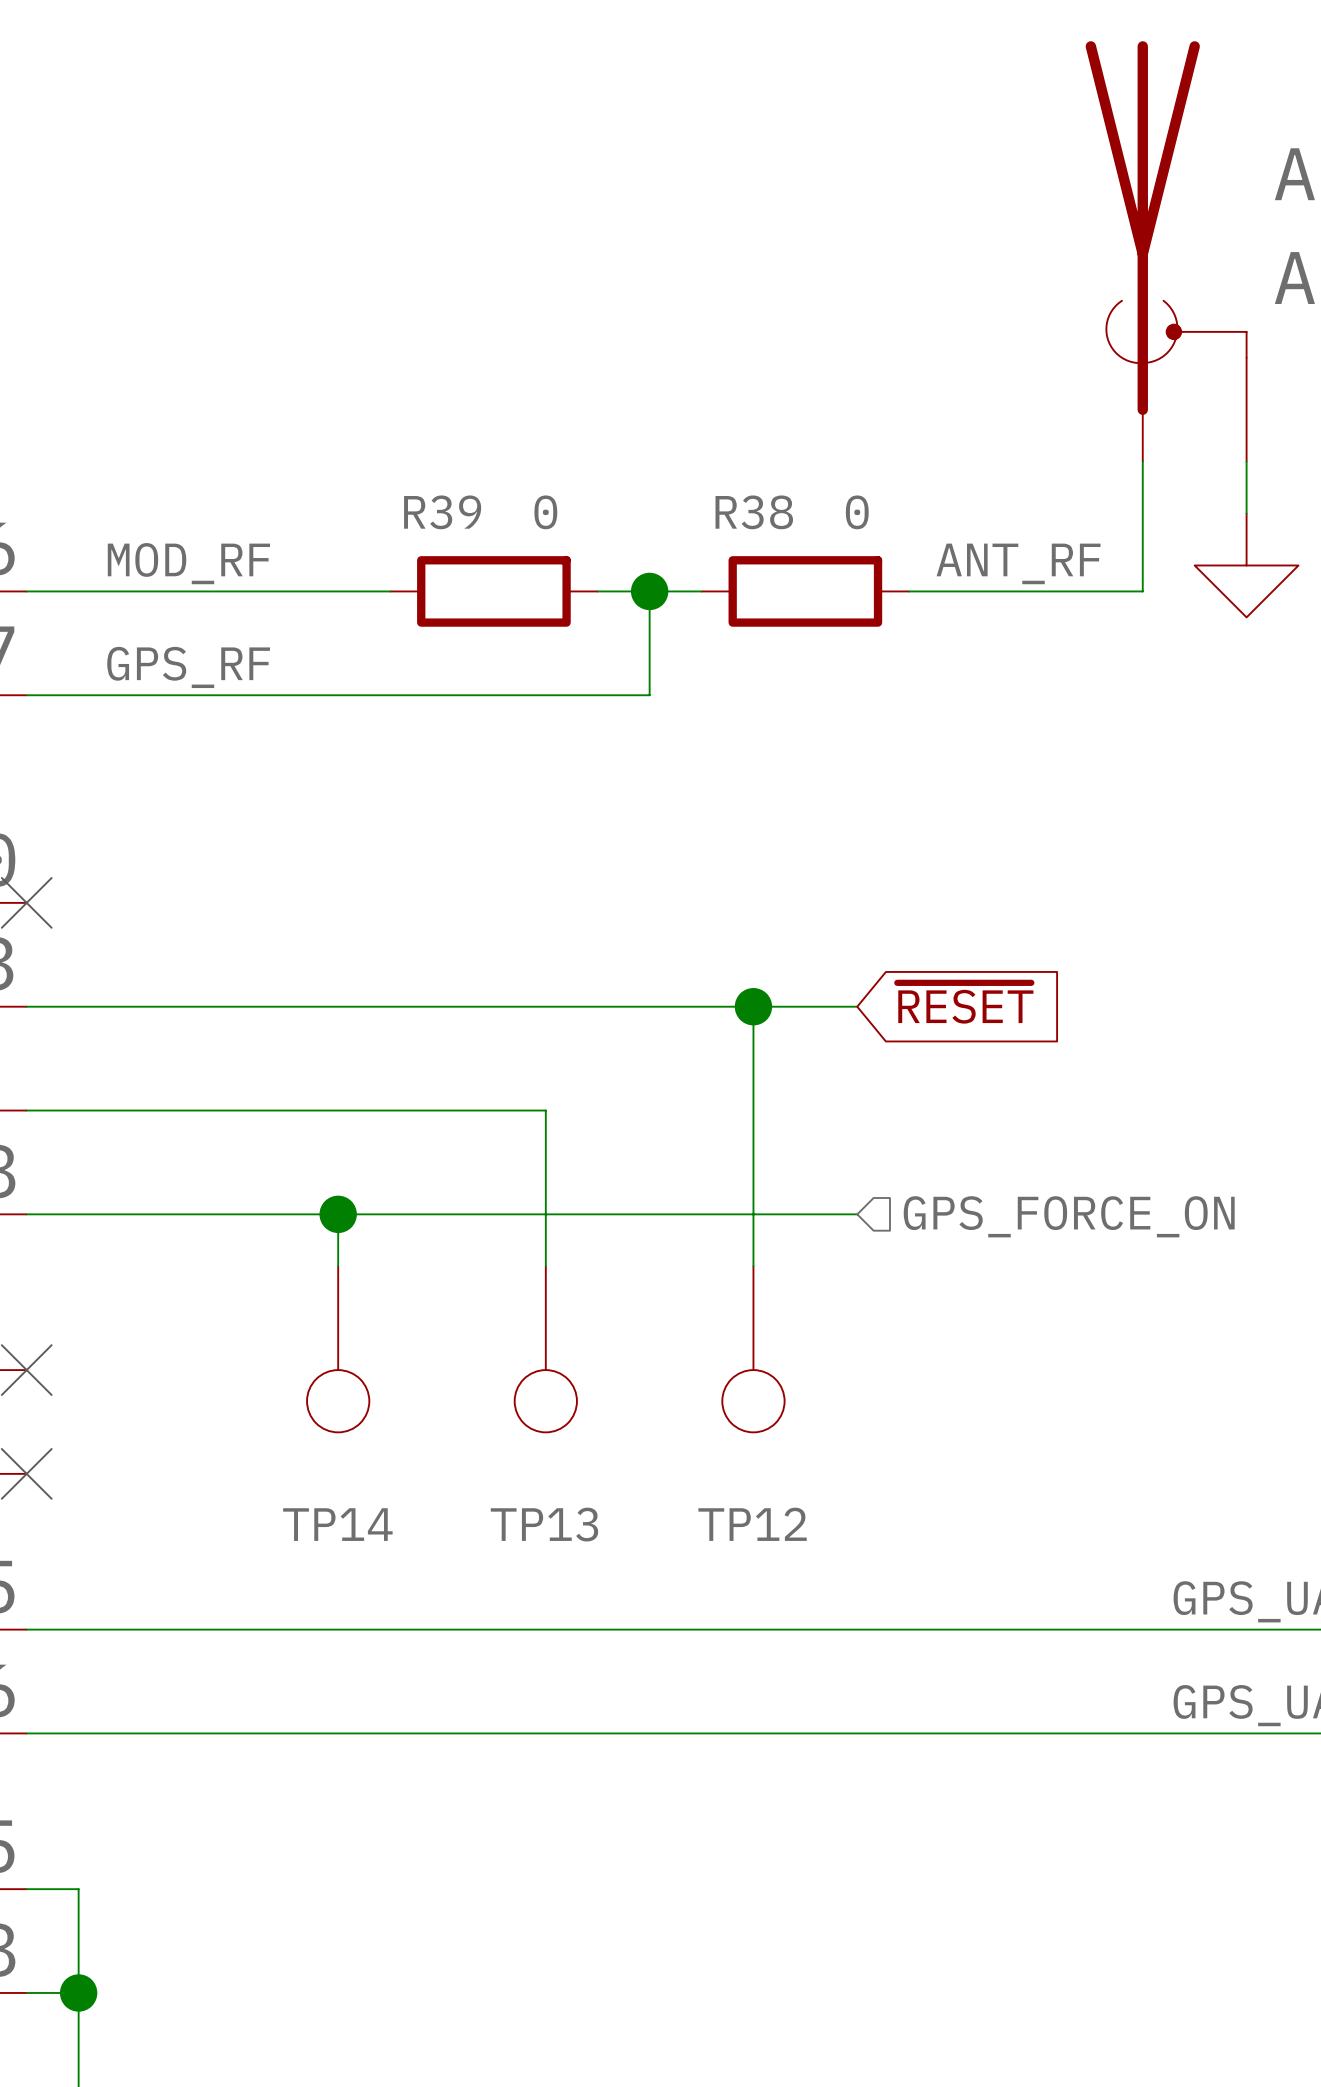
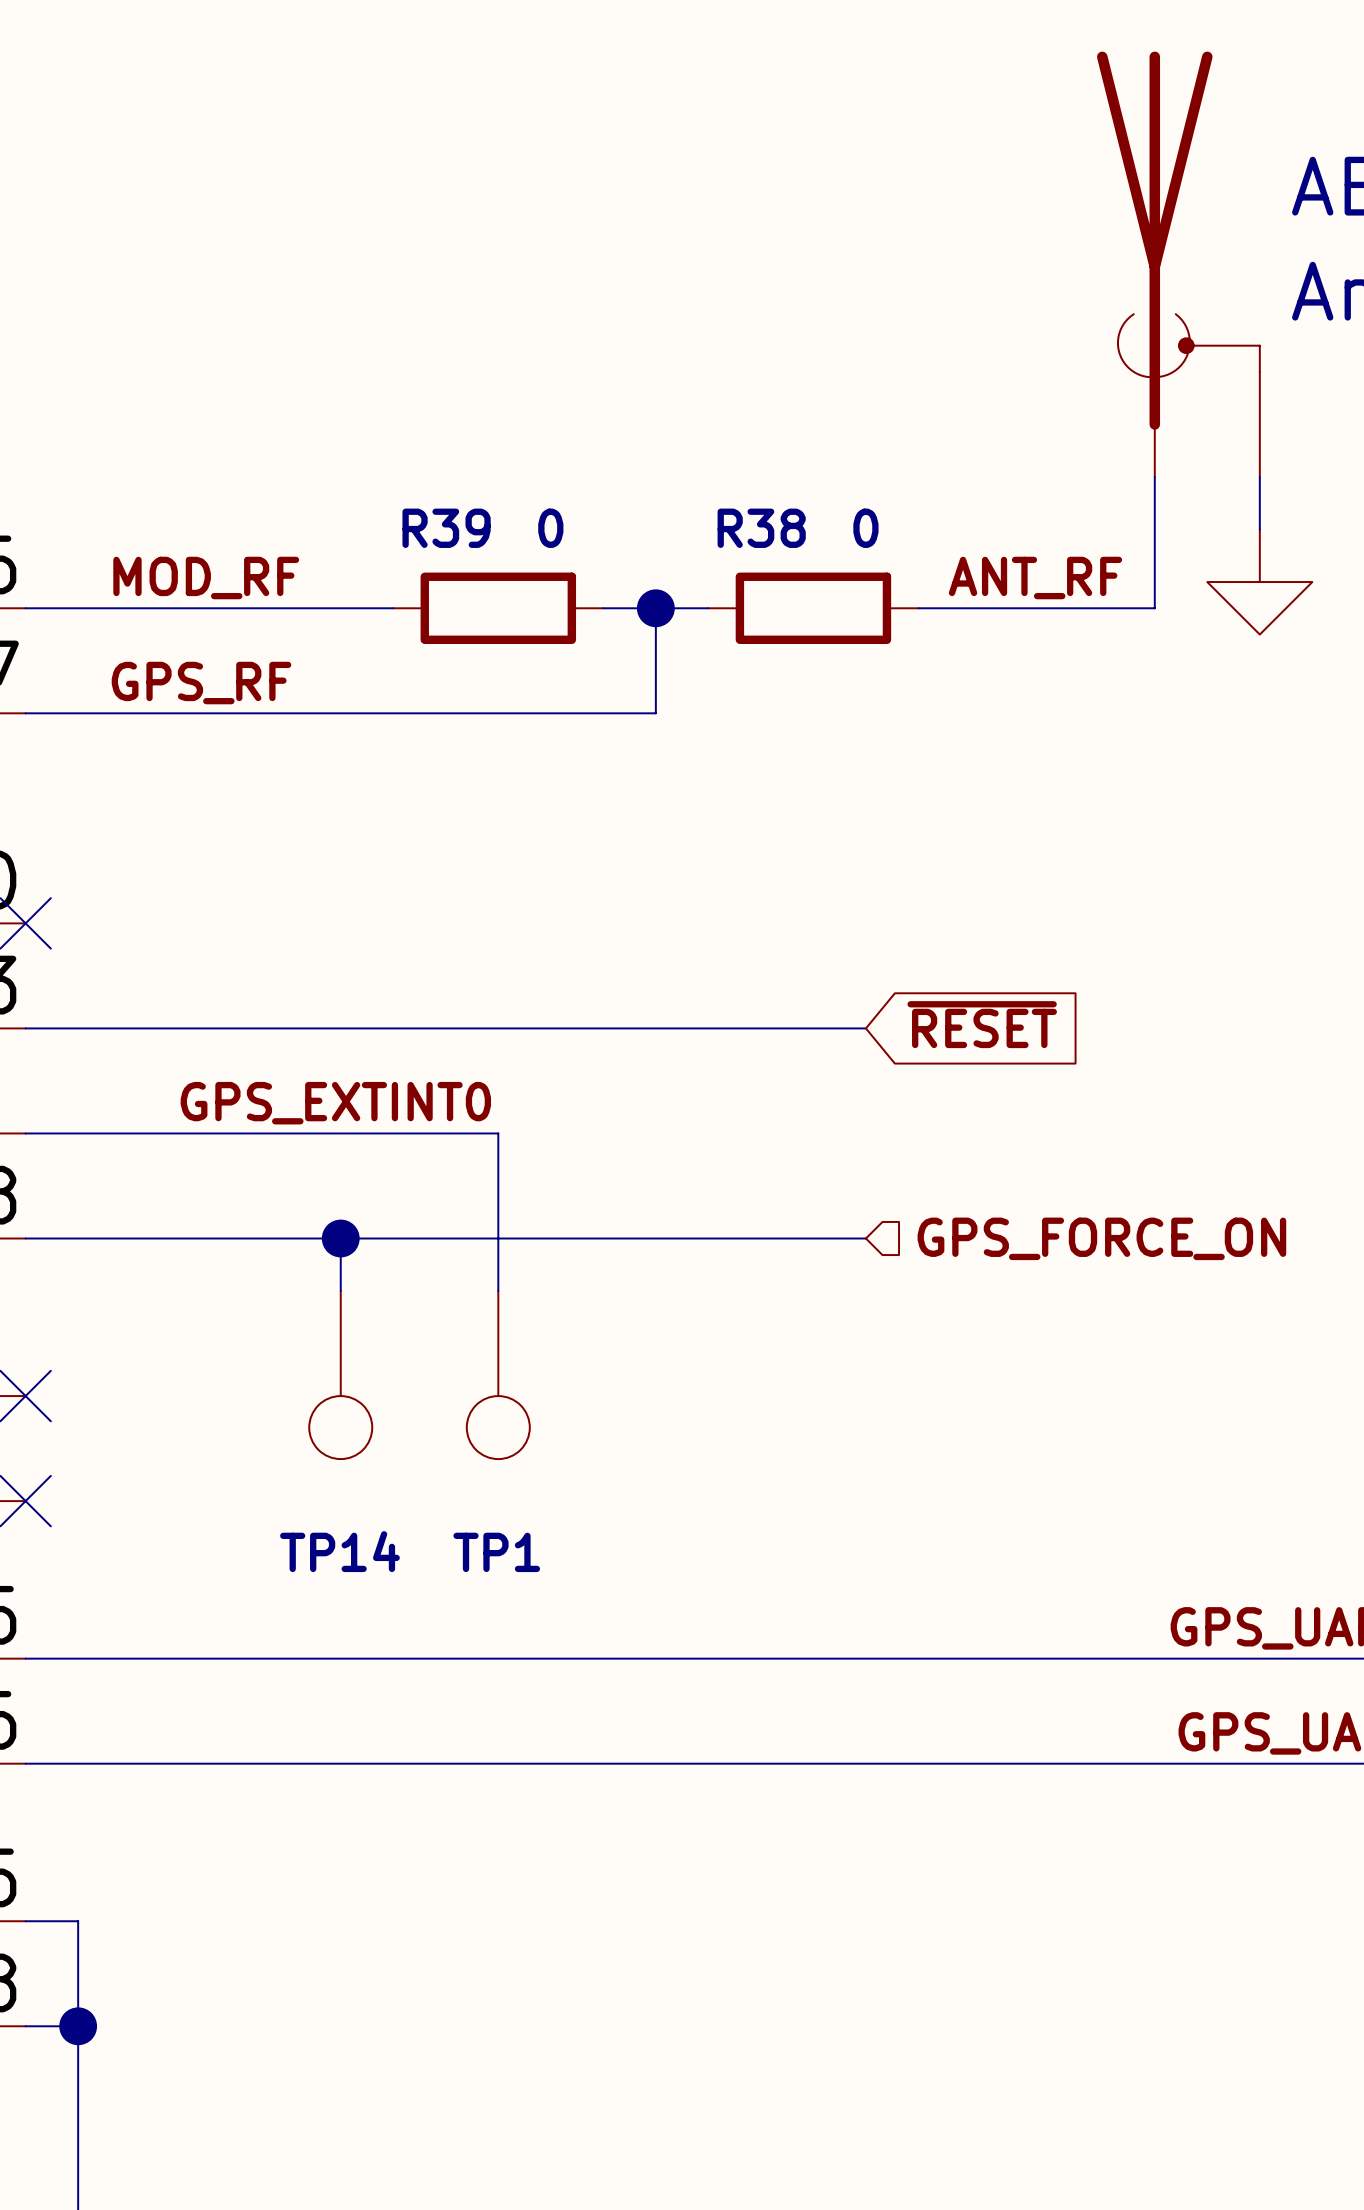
wire: (753, 1006) (753, 1266) -> none
junction: (753, 1006) -> none
label: none -> GPS_EXTINT0 (335, 1103)
wire: (493, 1110) (545, 1110) (545, 1266) -> (498, 1133) (498, 1291)
TP1: none -> (498, 1375)
TP13: (545, 1349) -> none
TP12: (753, 1349) -> none

